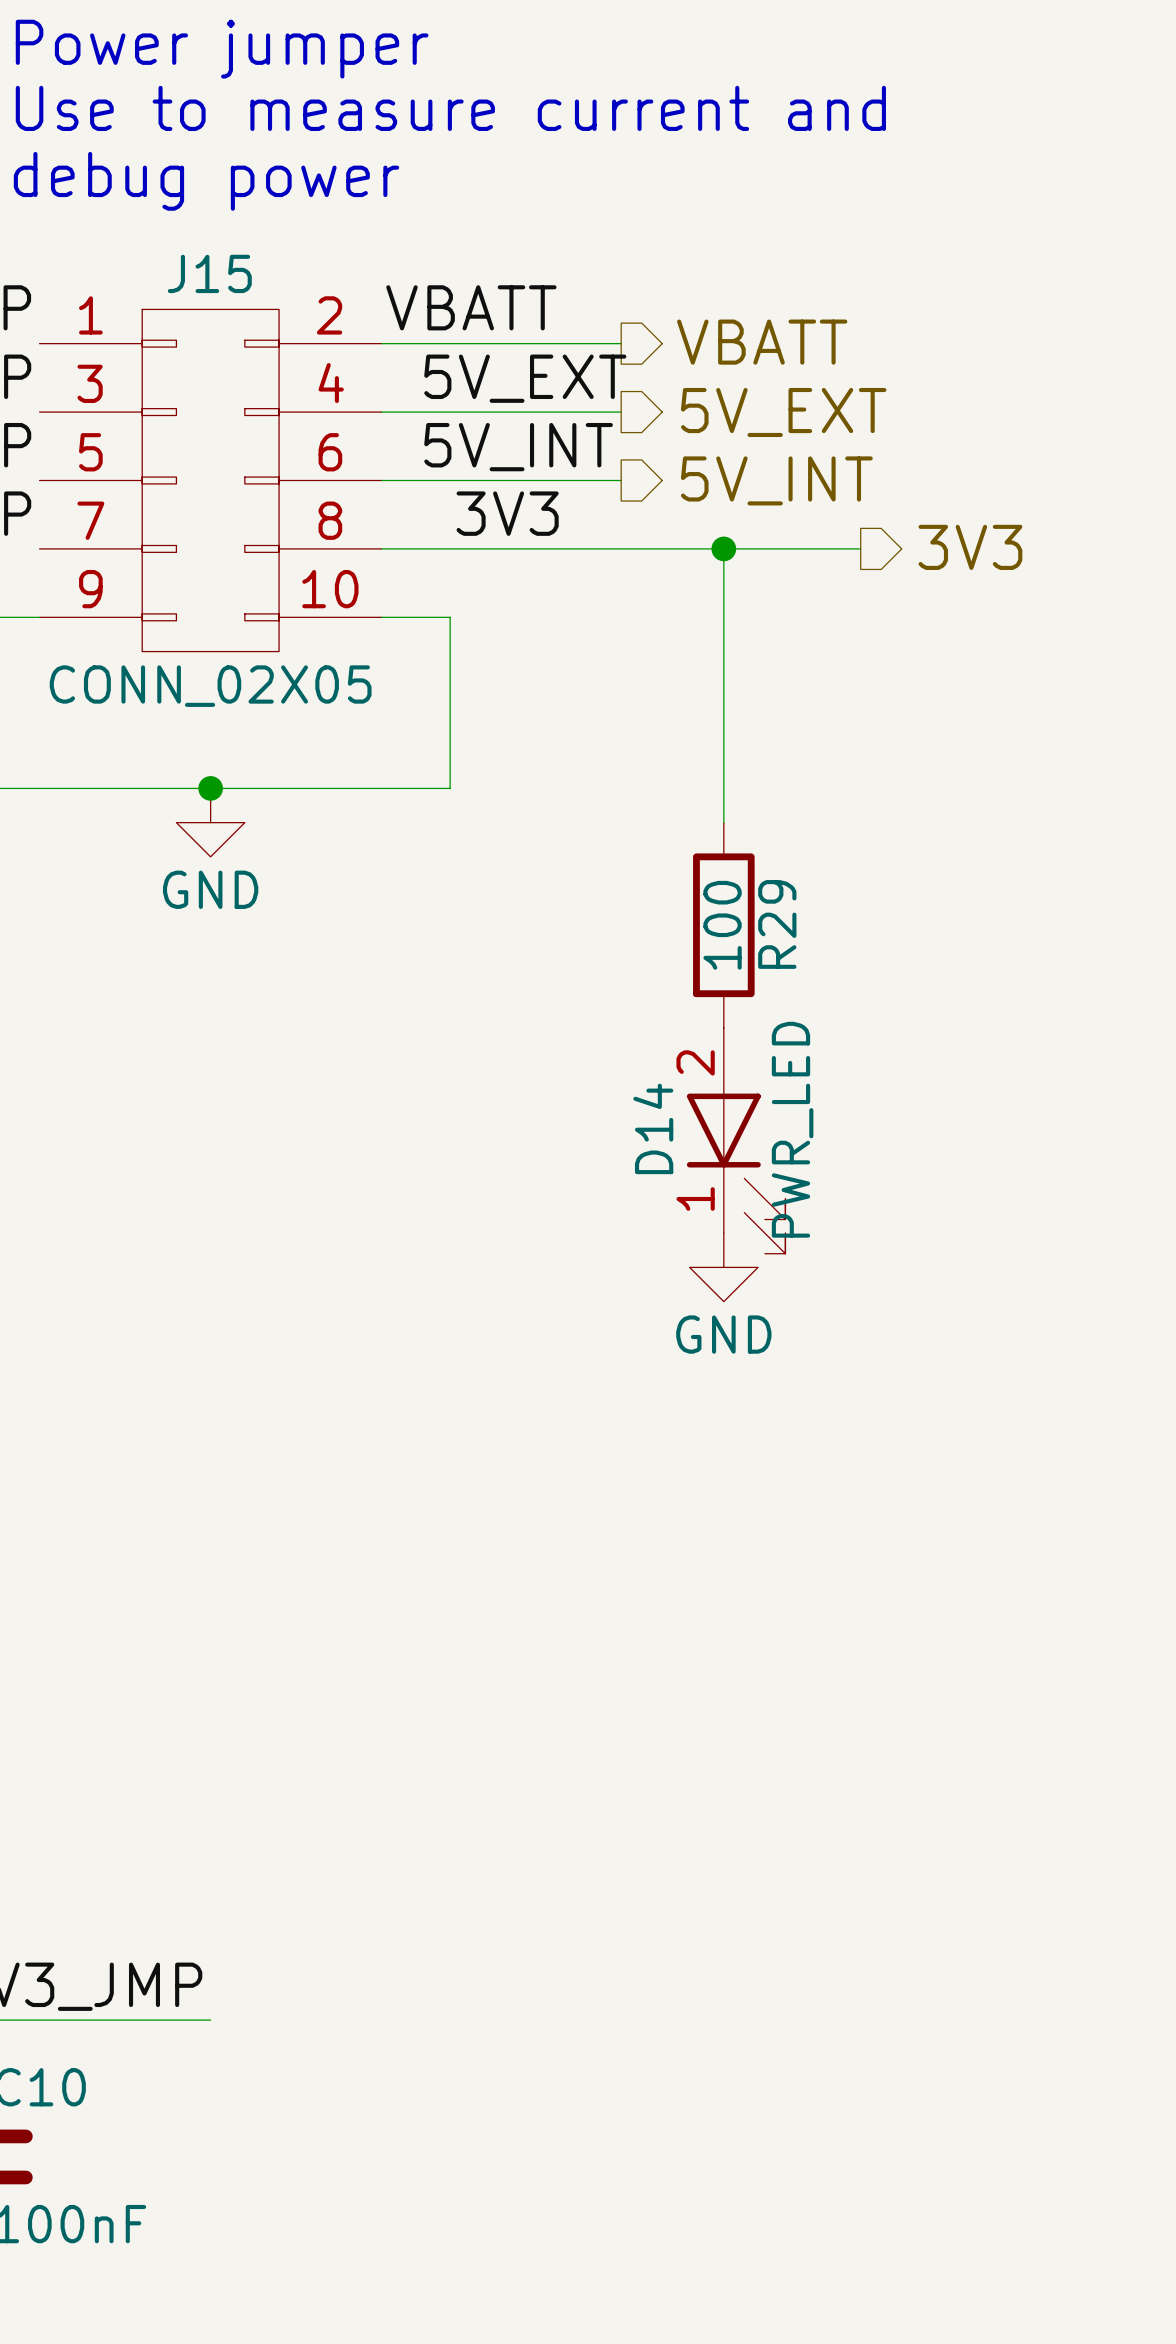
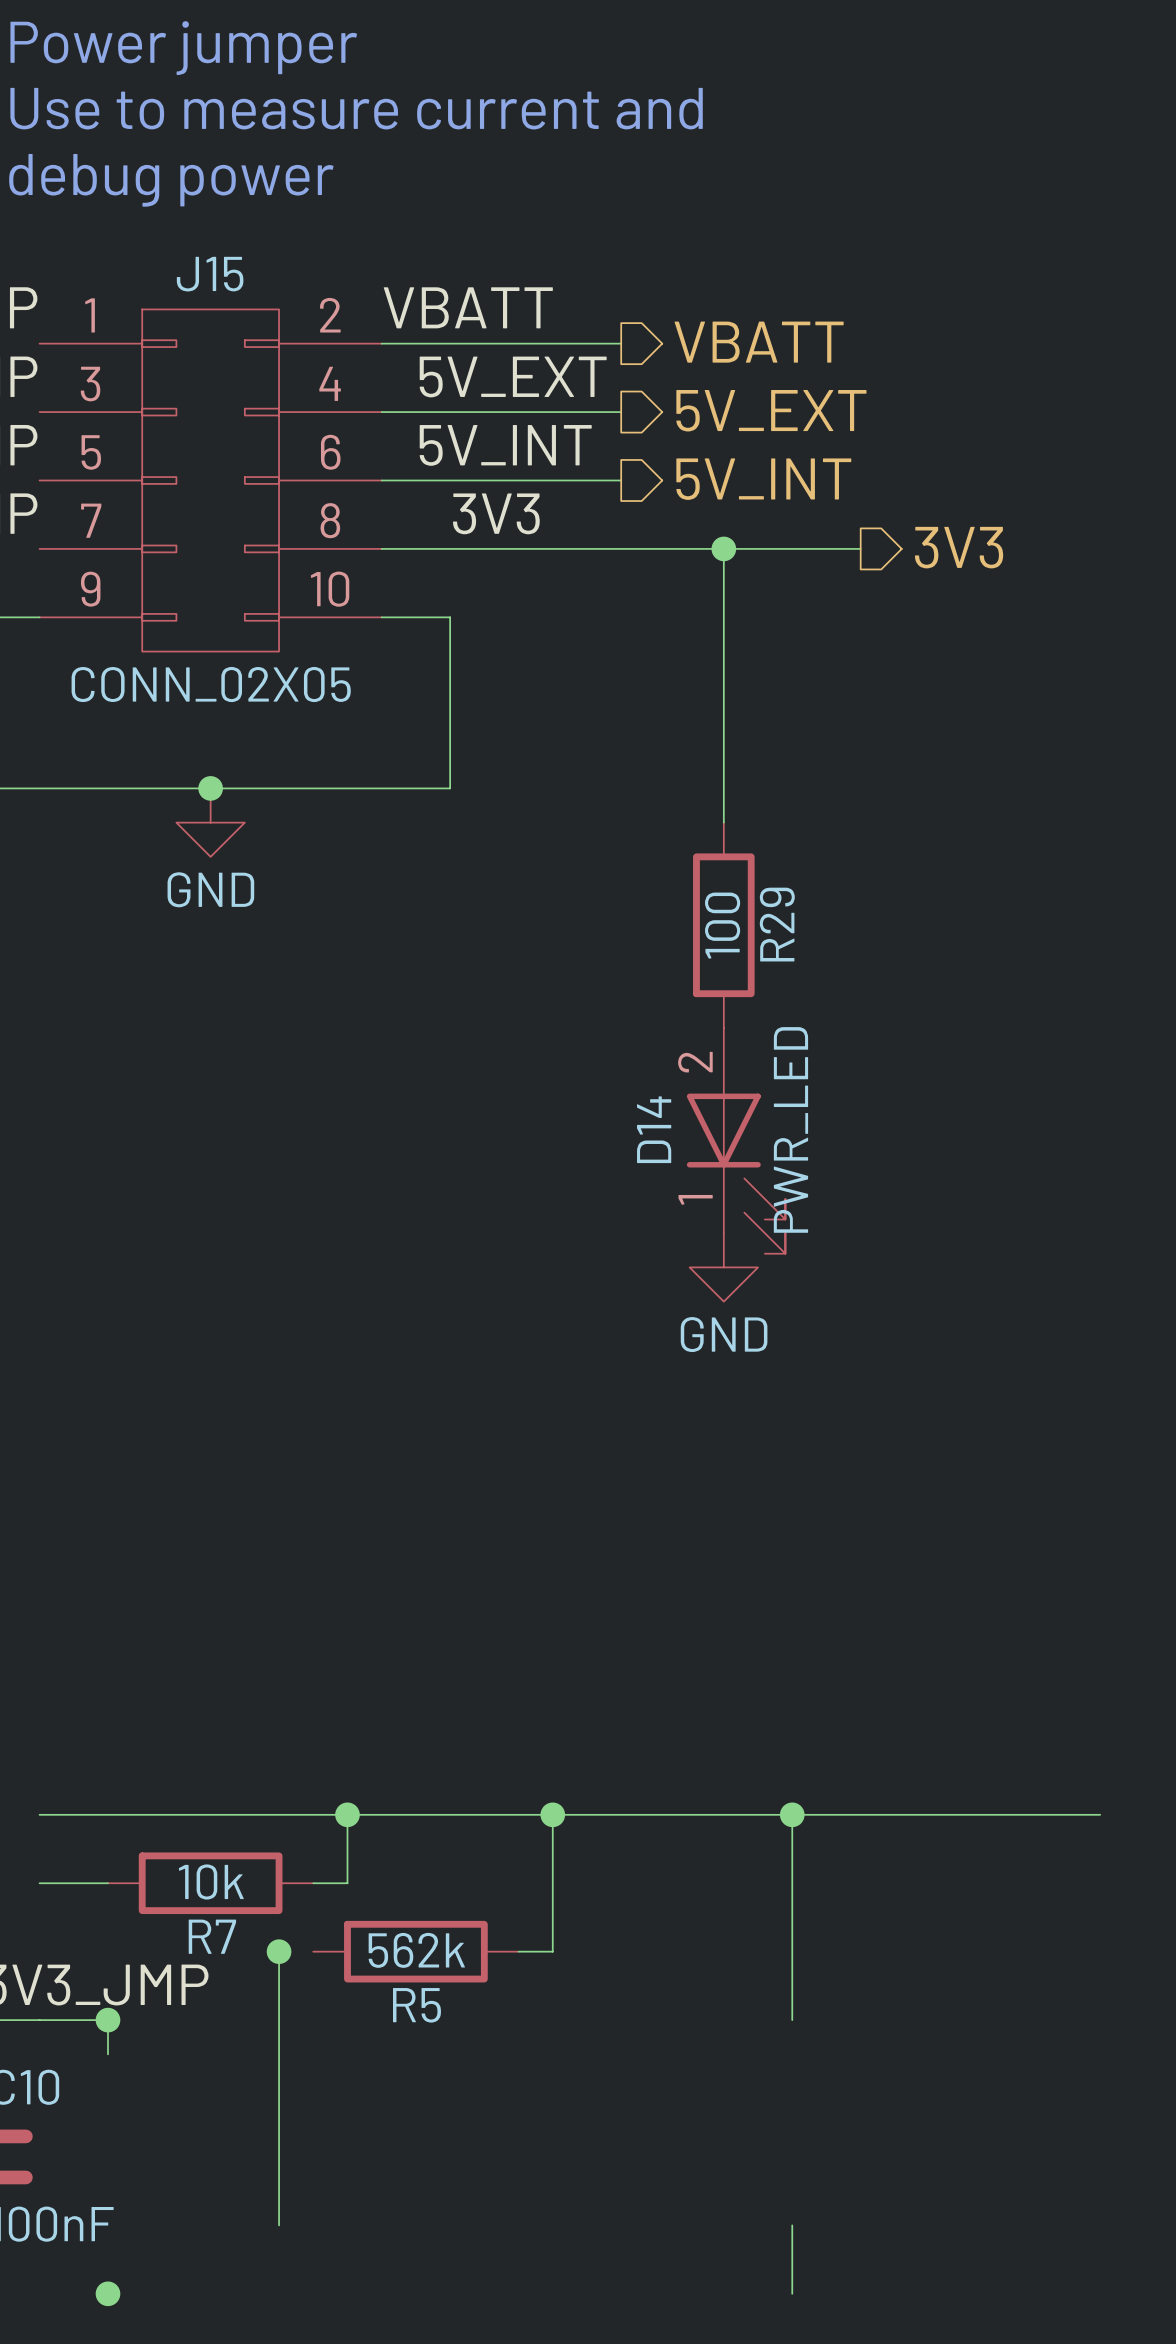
wire: none -> (39, 1814) (1100, 1814)
wire: none -> (347, 1814) (347, 1883) (313, 1883)
junction: none -> (347, 1814)
wire: none -> (552, 1814) (552, 1951) (518, 1951)
junction: none -> (552, 1814)
wire: none -> (792, 1814) (792, 2020)
junction: none -> (792, 1814)
wire: none -> (39, 1883) (107, 1883)
R7: none -> 10k (210, 1883)
wire: none -> (279, 1951) (279, 2225)
junction: none -> (279, 1951)
R5: none -> 562k (415, 1951)
wire: (107, 2020) (210, 2020) -> (107, 2020) (107, 2054)
junction: none -> (107, 2020)
wire: none -> (792, 2225) (792, 2293)
junction: none -> (107, 2293)

